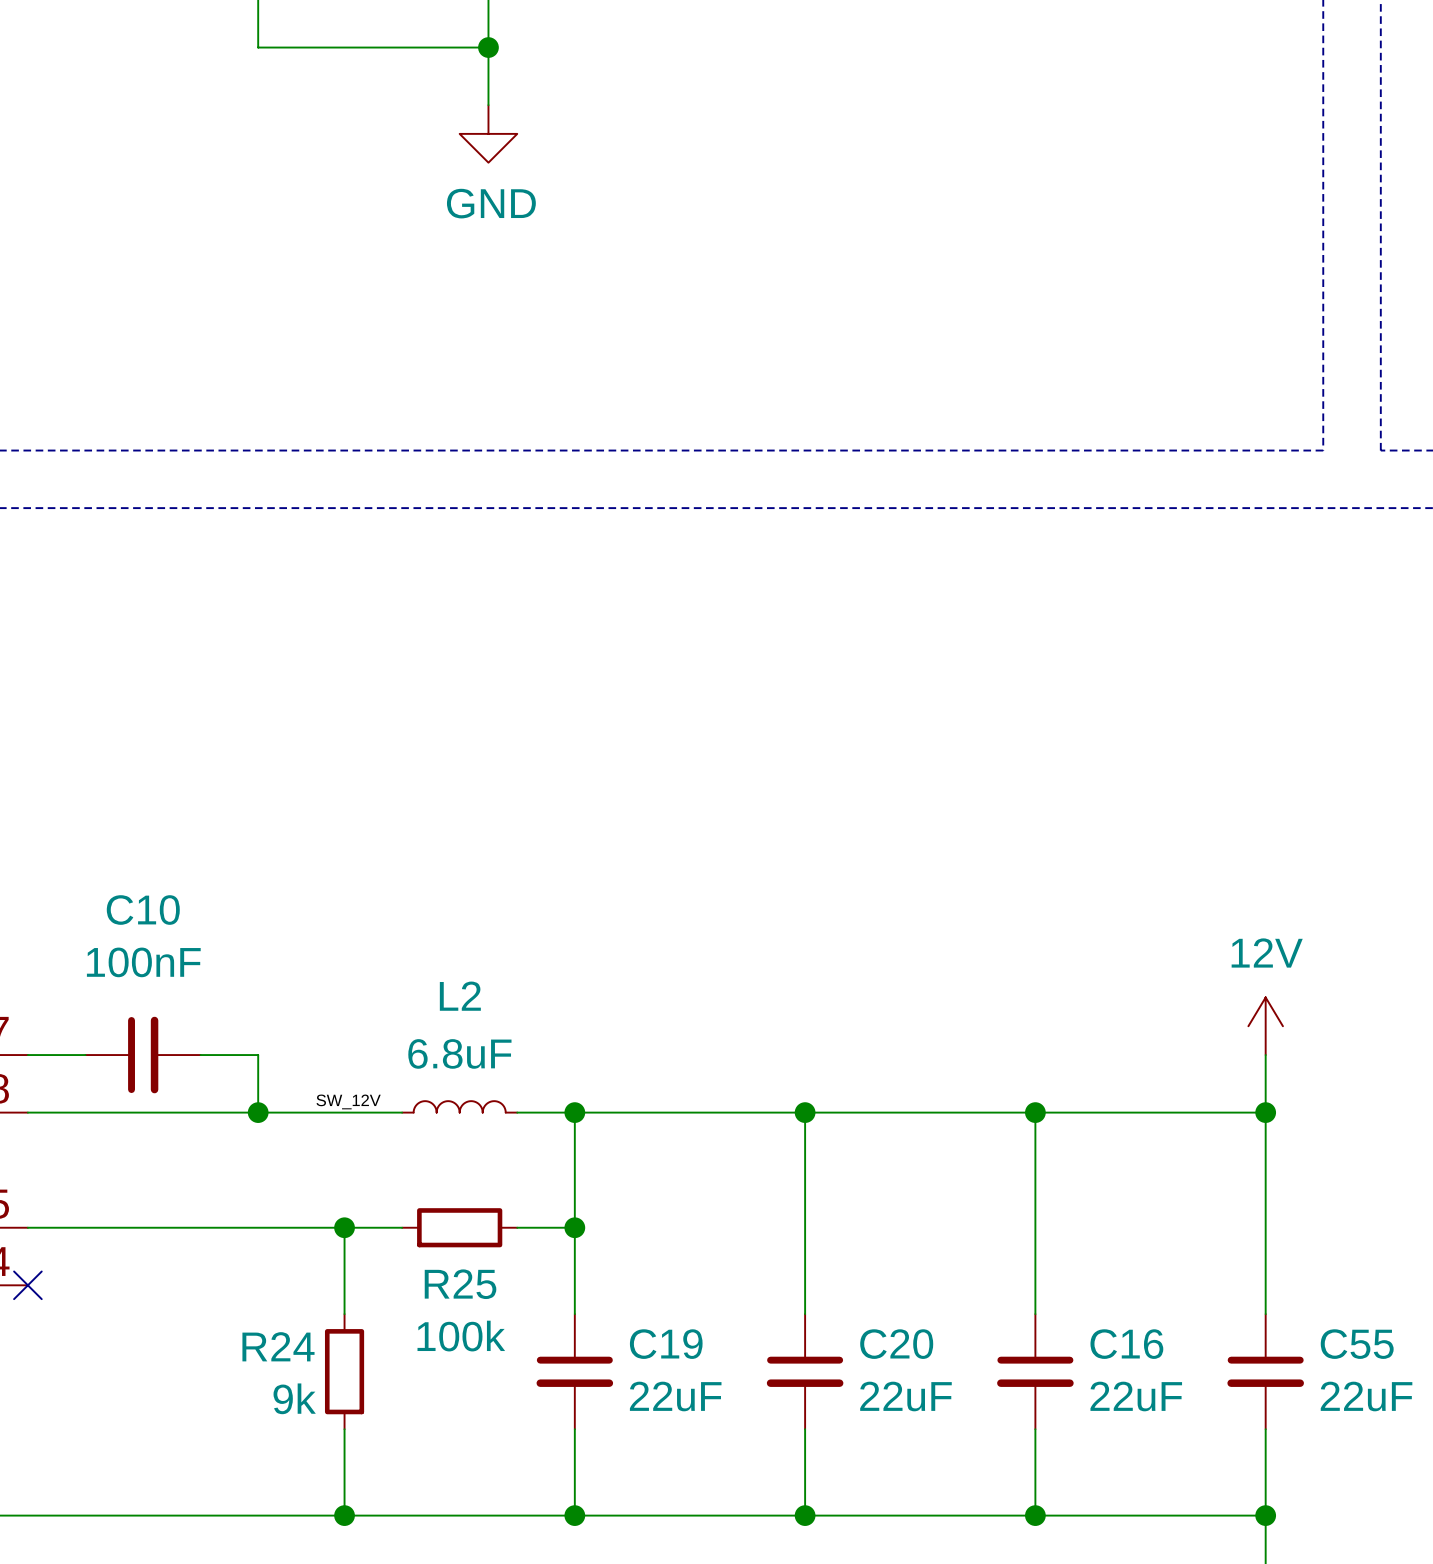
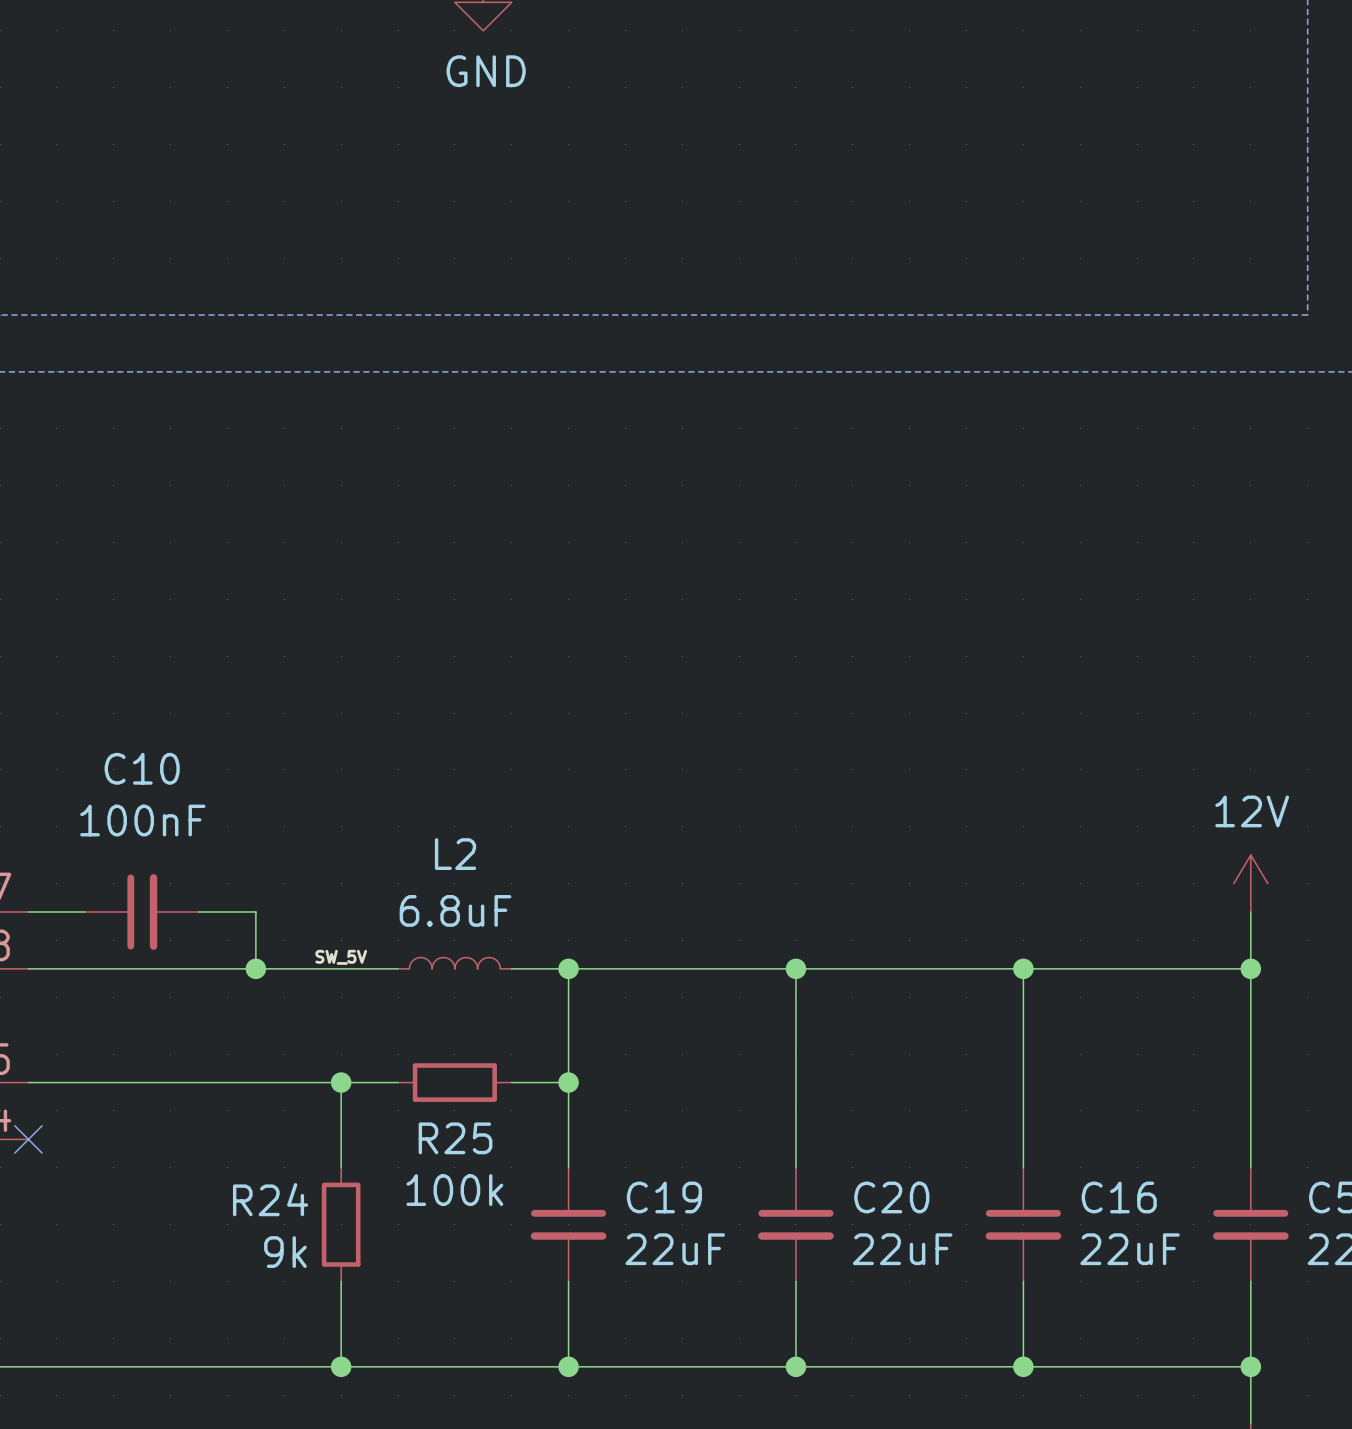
label: SW_12V (348, 1101) -> SW_5V (341, 957)

